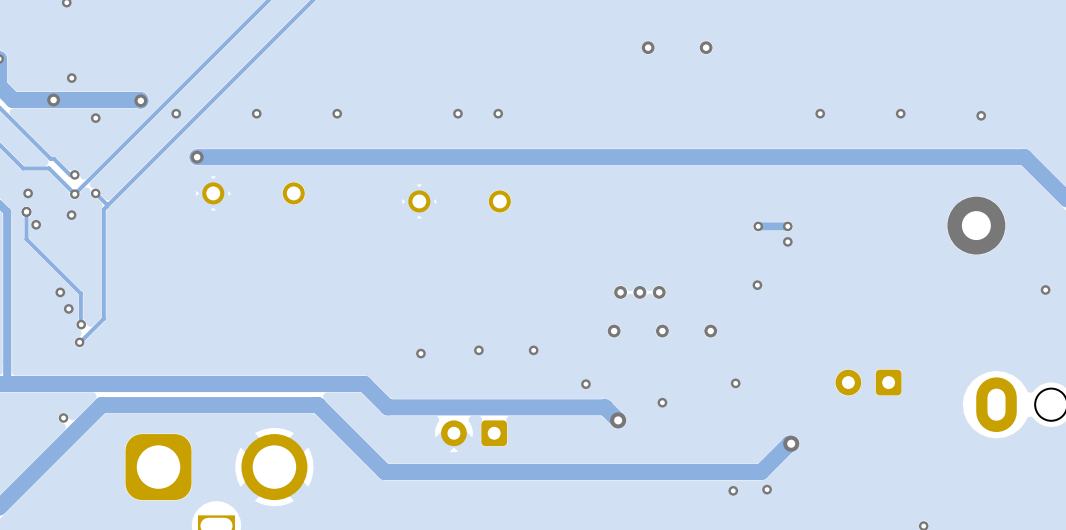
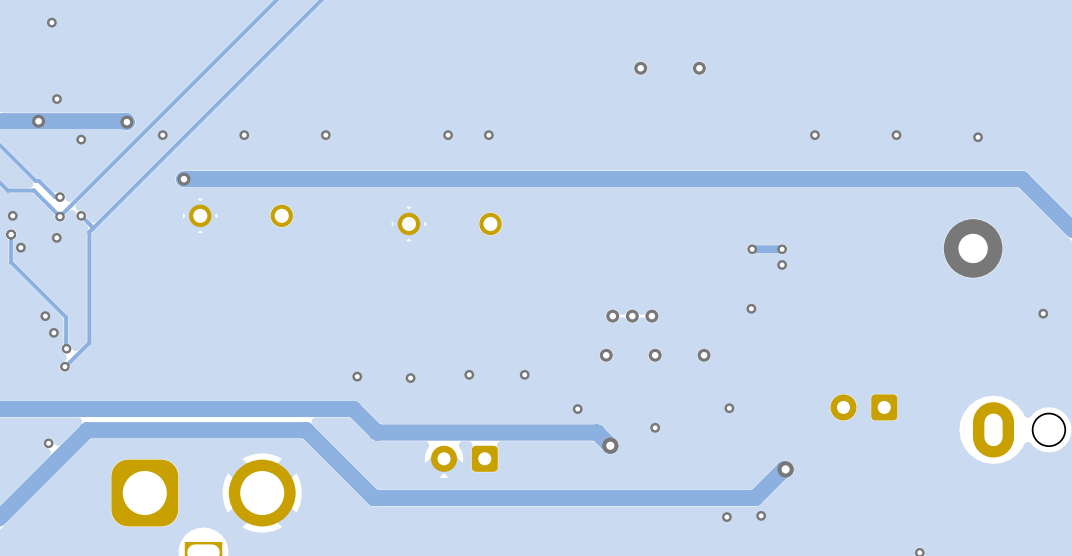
via: none -> (357, 376)

